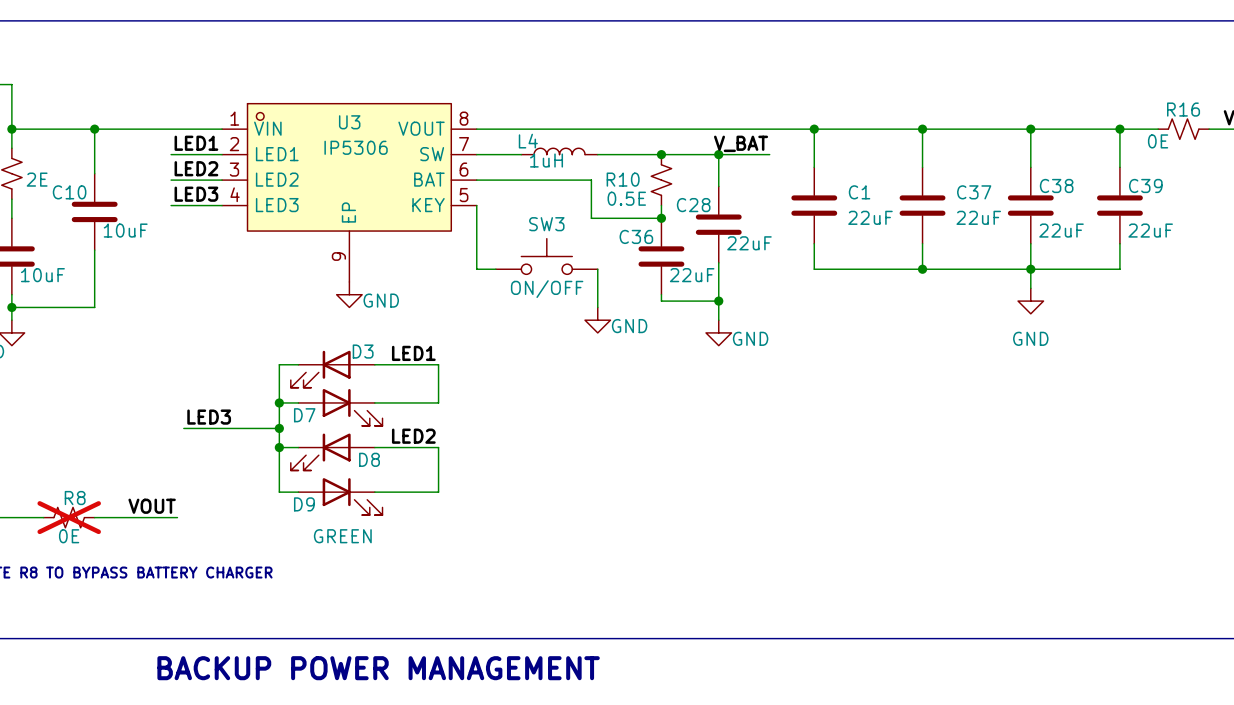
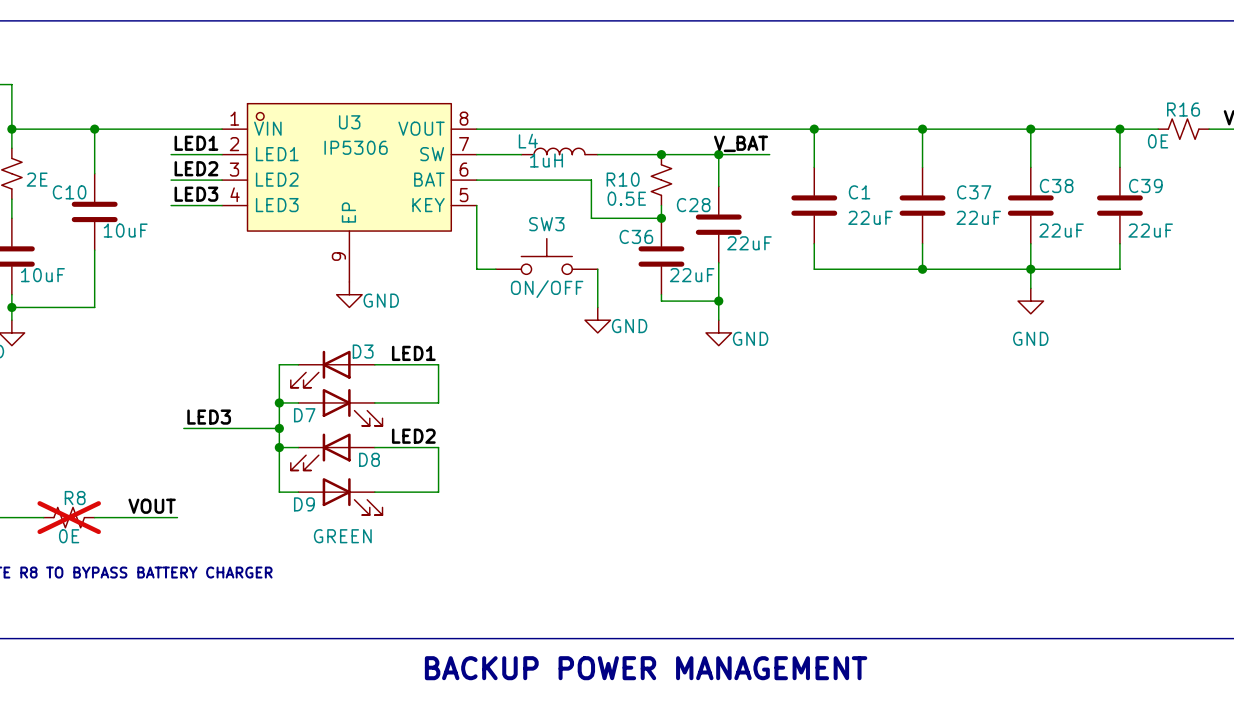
text: BACKUP POWER MANAGEMENT (378, 668) -> none
text: none -> BACKUP POWER MANAGEMENT (646, 668)

